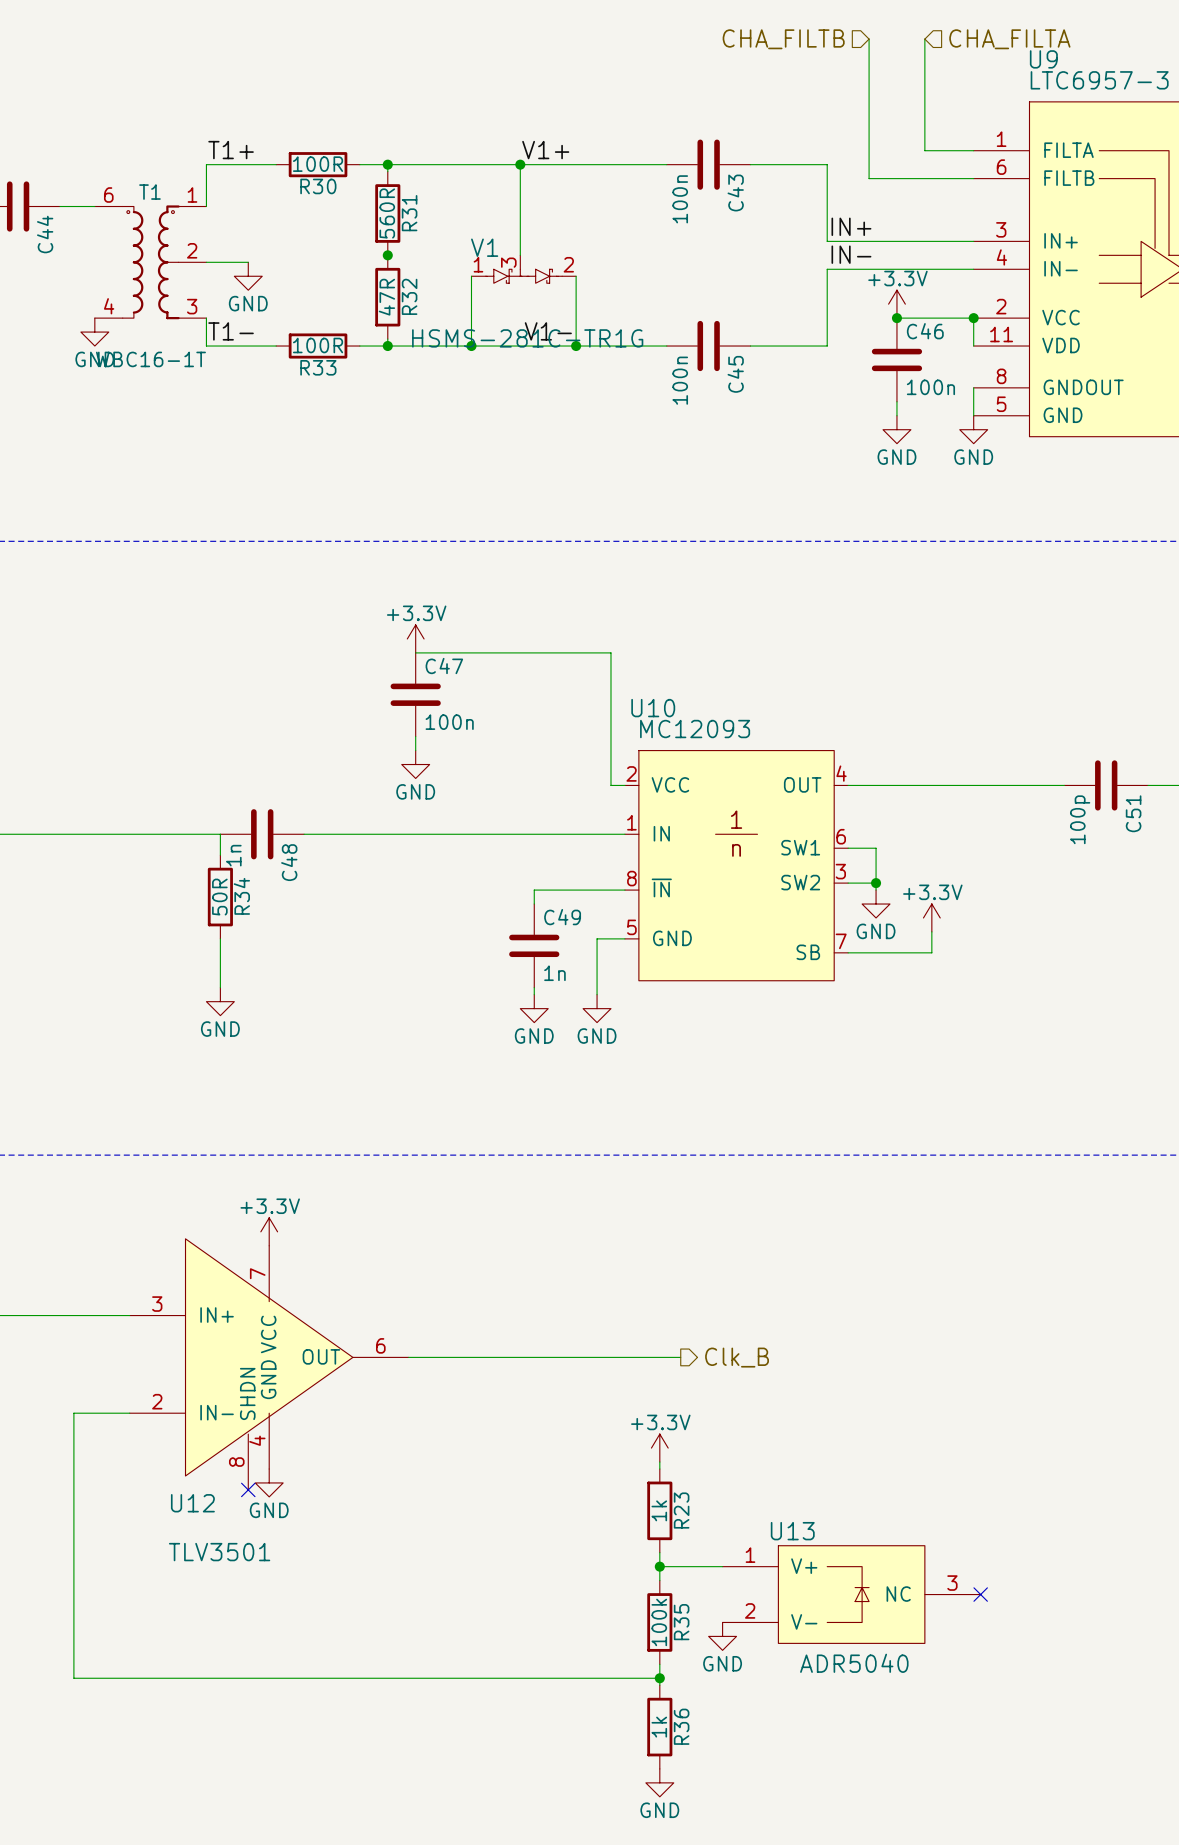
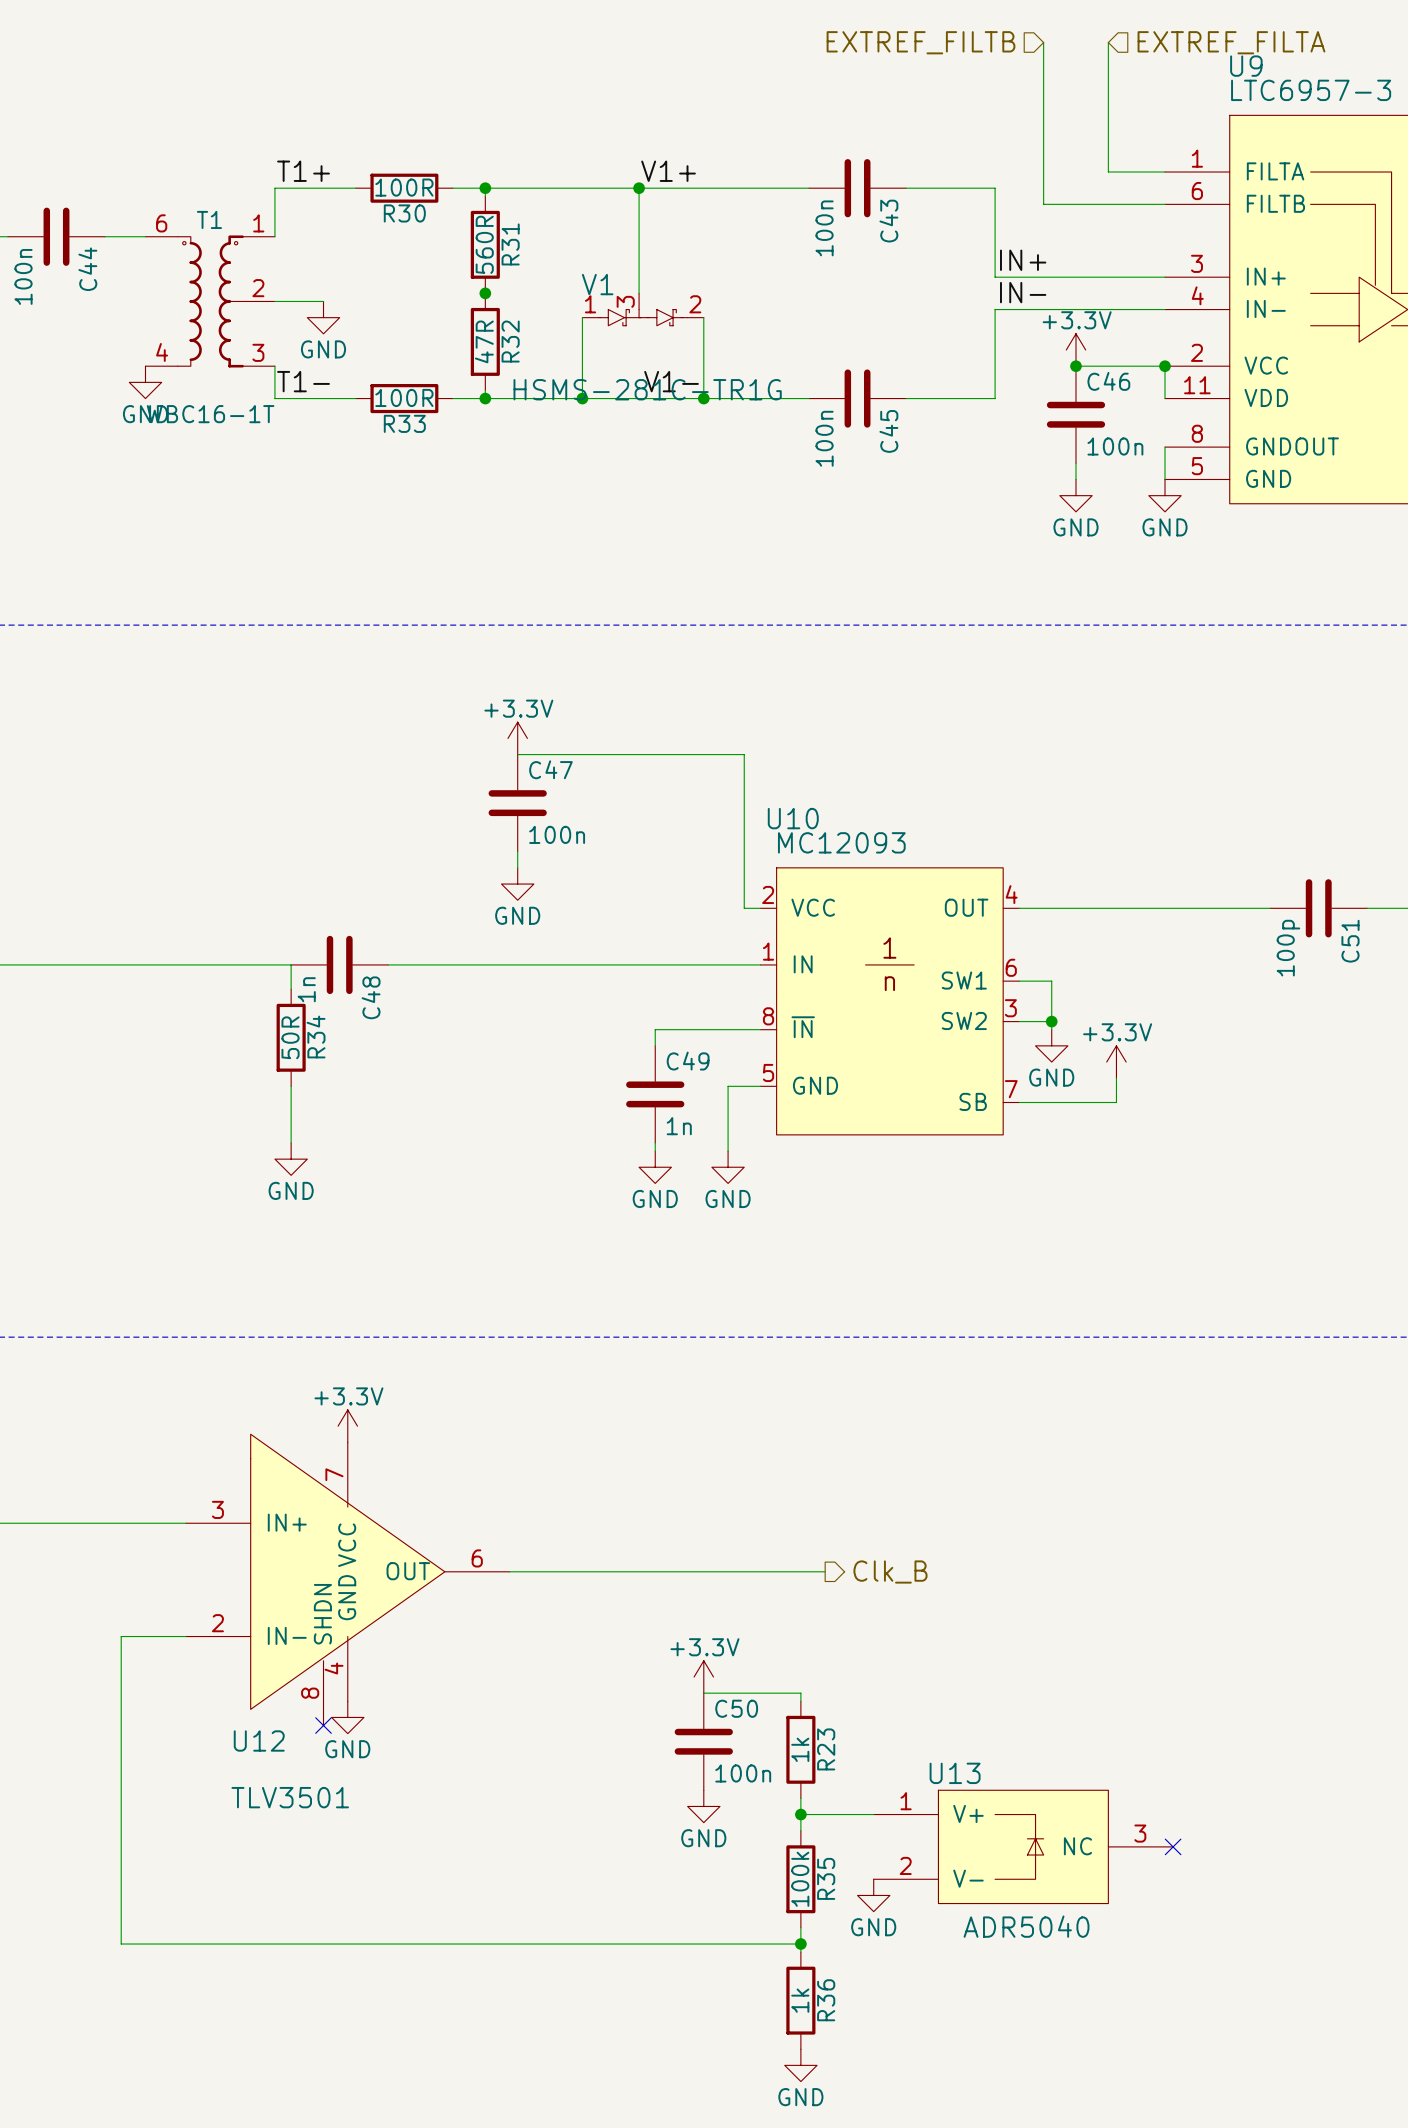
hierarchical label: CHA_FILTB (783, 39) -> EXTREF_FILTB (920, 42)
hierarchical label: CHA_FILTA (1009, 39) -> EXTREF_FILTA (1231, 42)
power symbol position: +3.3V (659, 1448) -> +3.3V (703, 1676)
wire: none -> (703, 1693) (800, 1693)
C50: none -> 100n (703, 1741)
power symbol: none -> GND (703, 1806)

